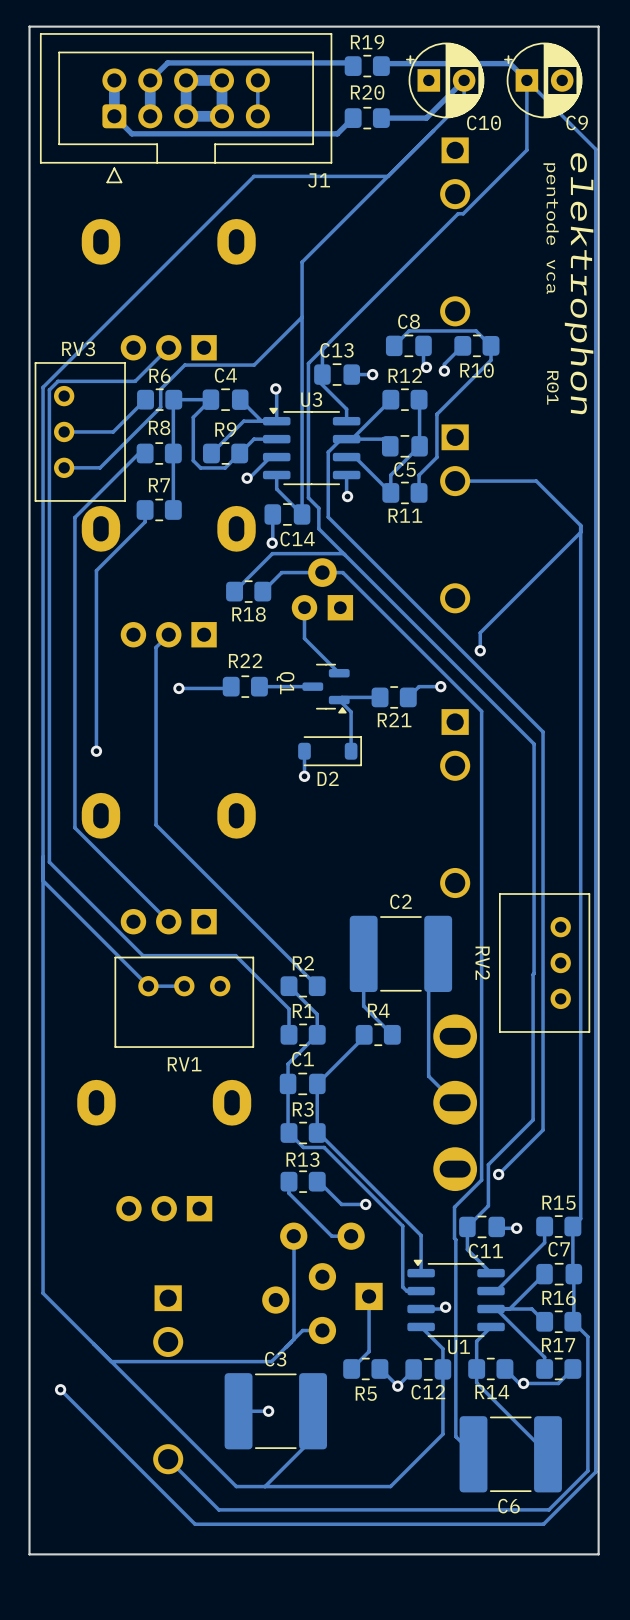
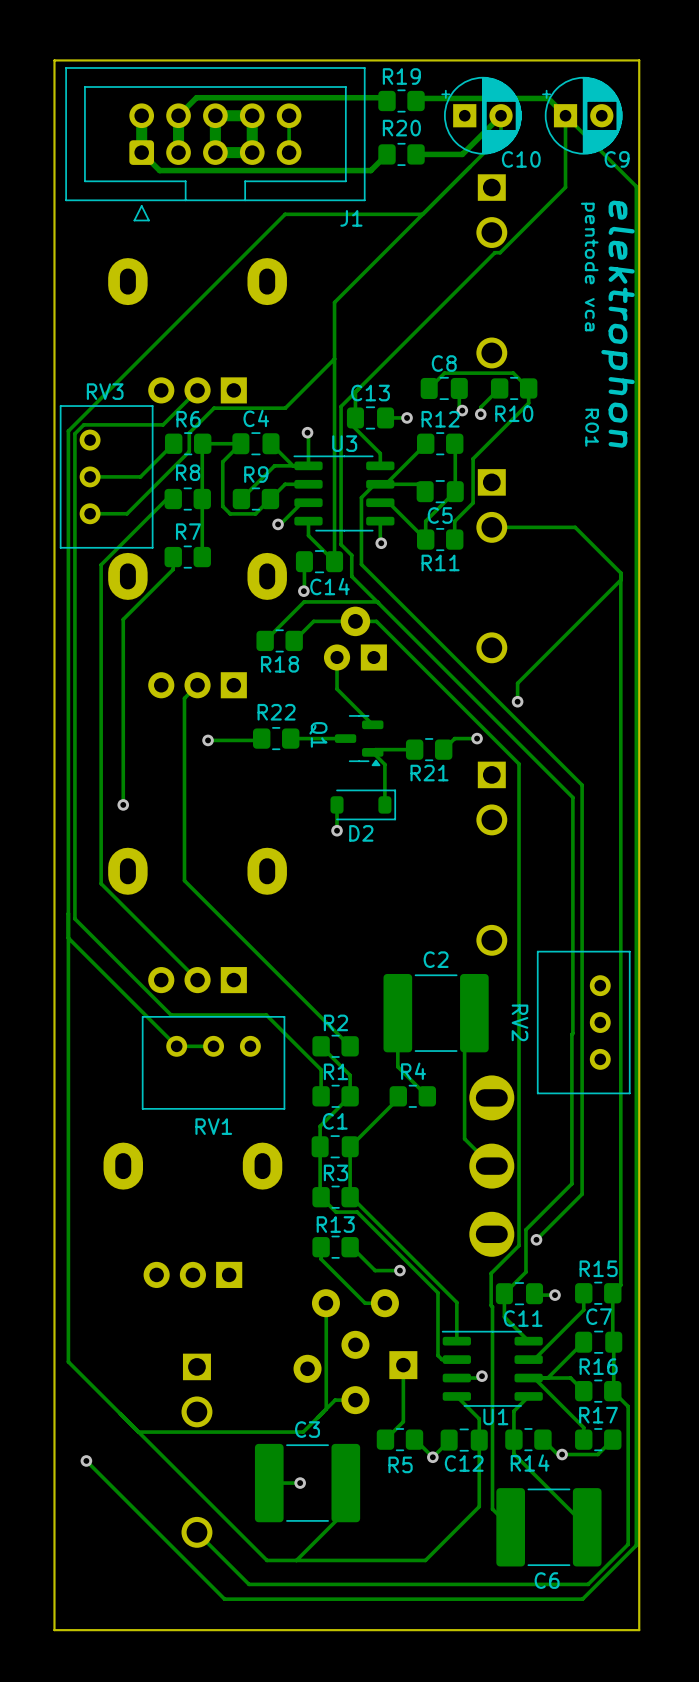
U3 footprint: [262, 407, 361, 486] -> [293, 455, 395, 532]
U1 footprint: [407, 1259, 505, 1338] -> [441, 1330, 543, 1407]

